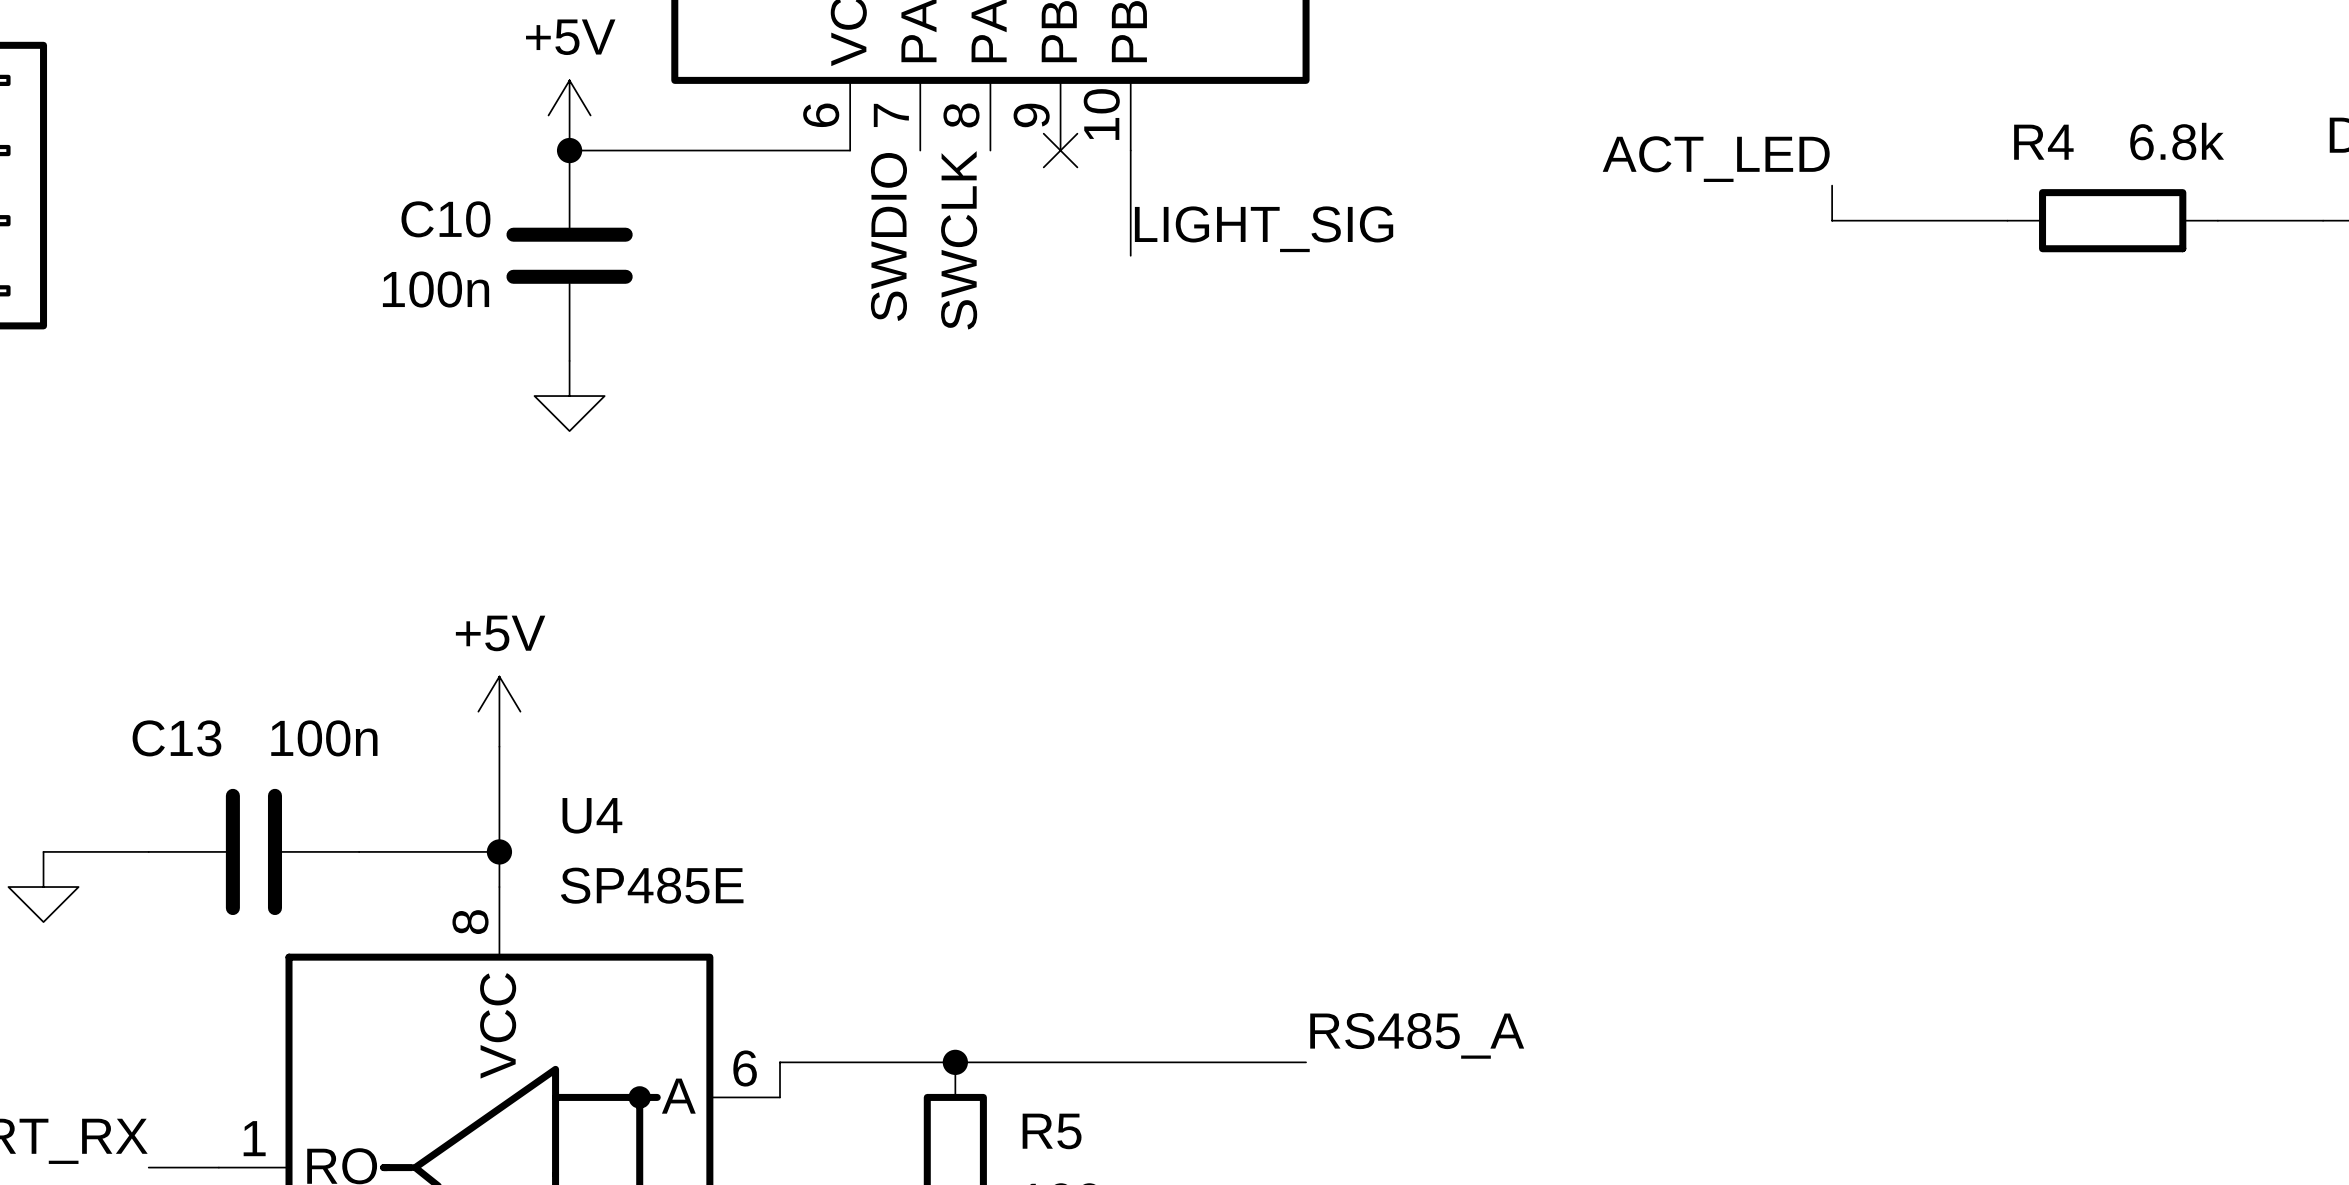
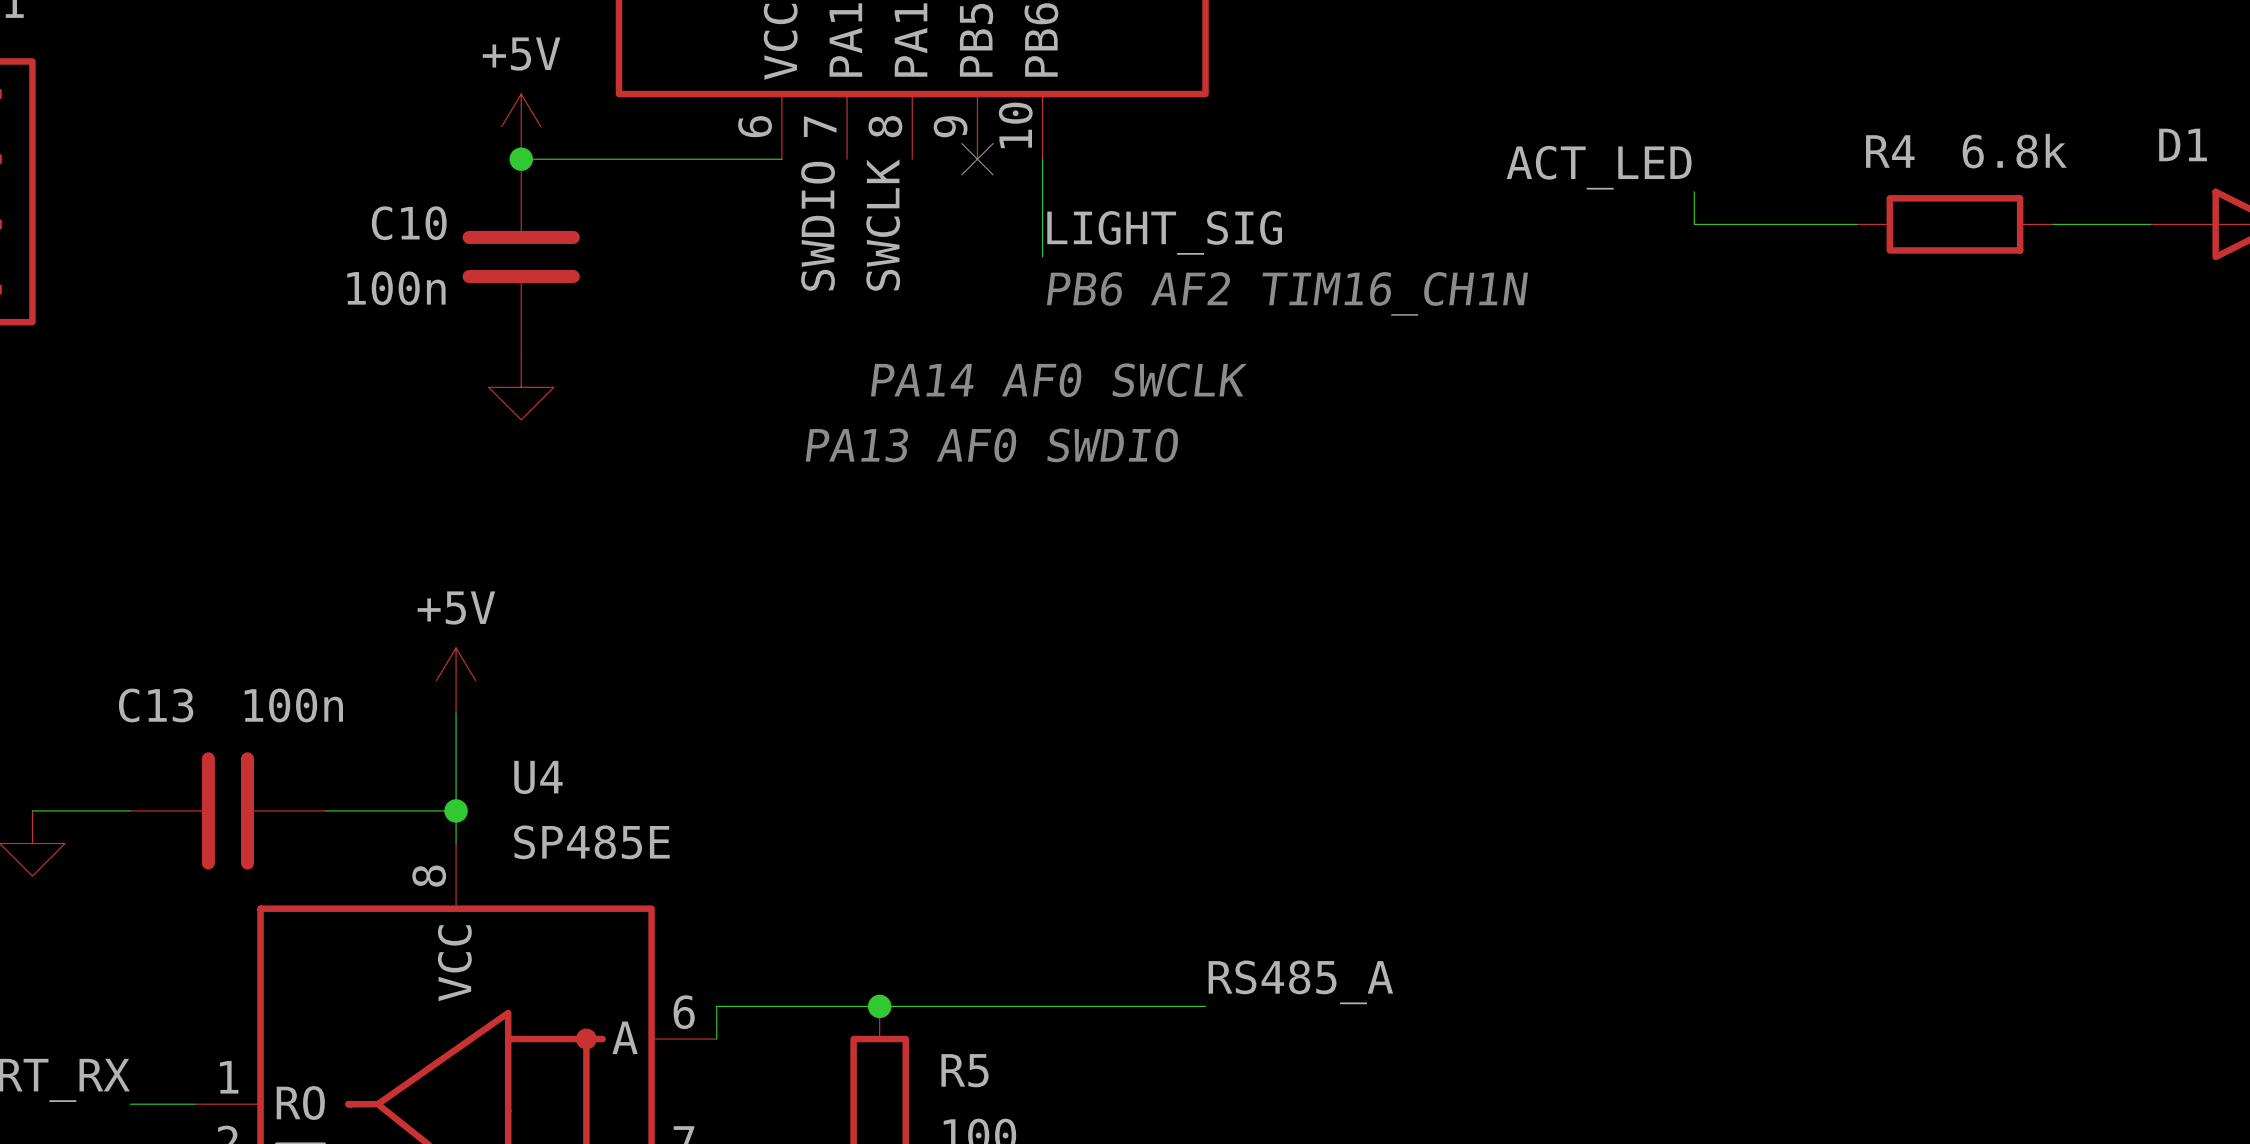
text: none -> PB6 AF2 TIM16_CH1N (1287, 293)
text: none -> PA14 AF0 SWCLK (1058, 380)
text: none -> PA13 AF0 SWDIO (992, 445)

